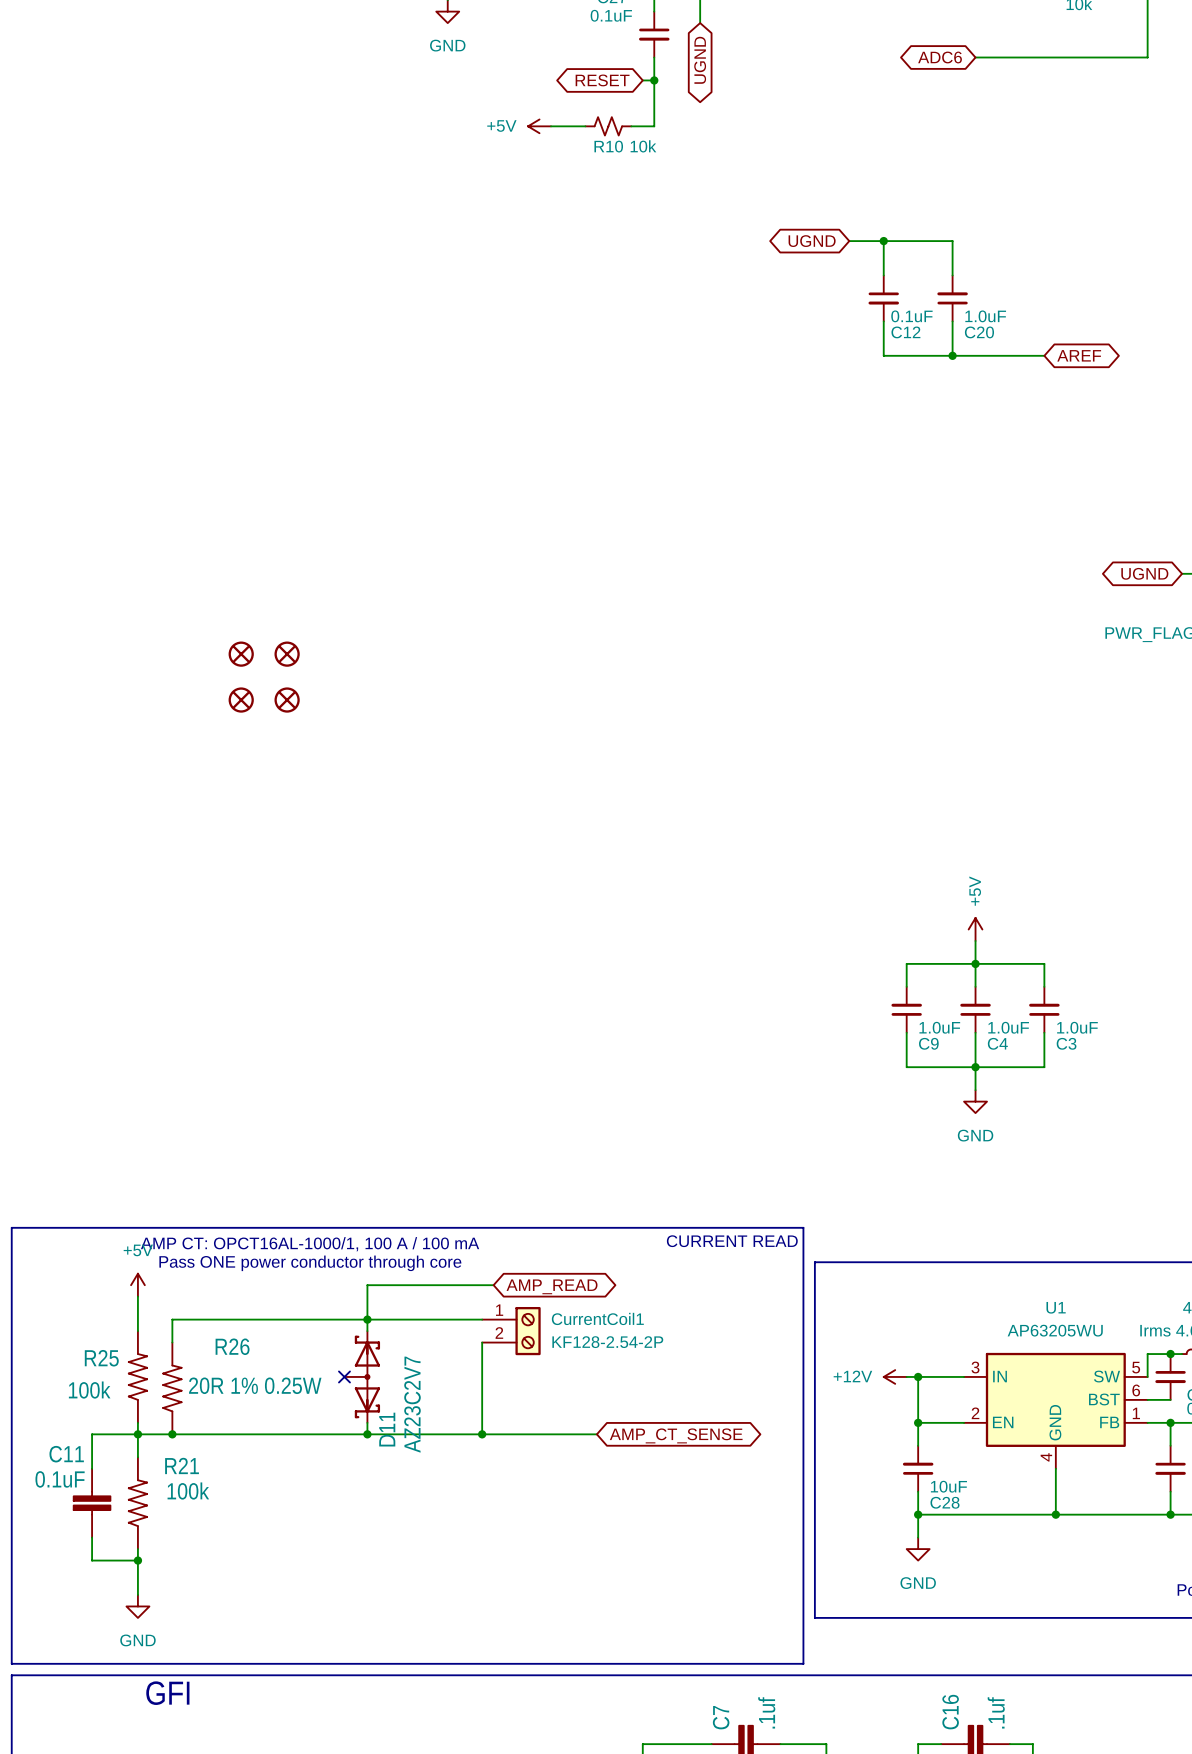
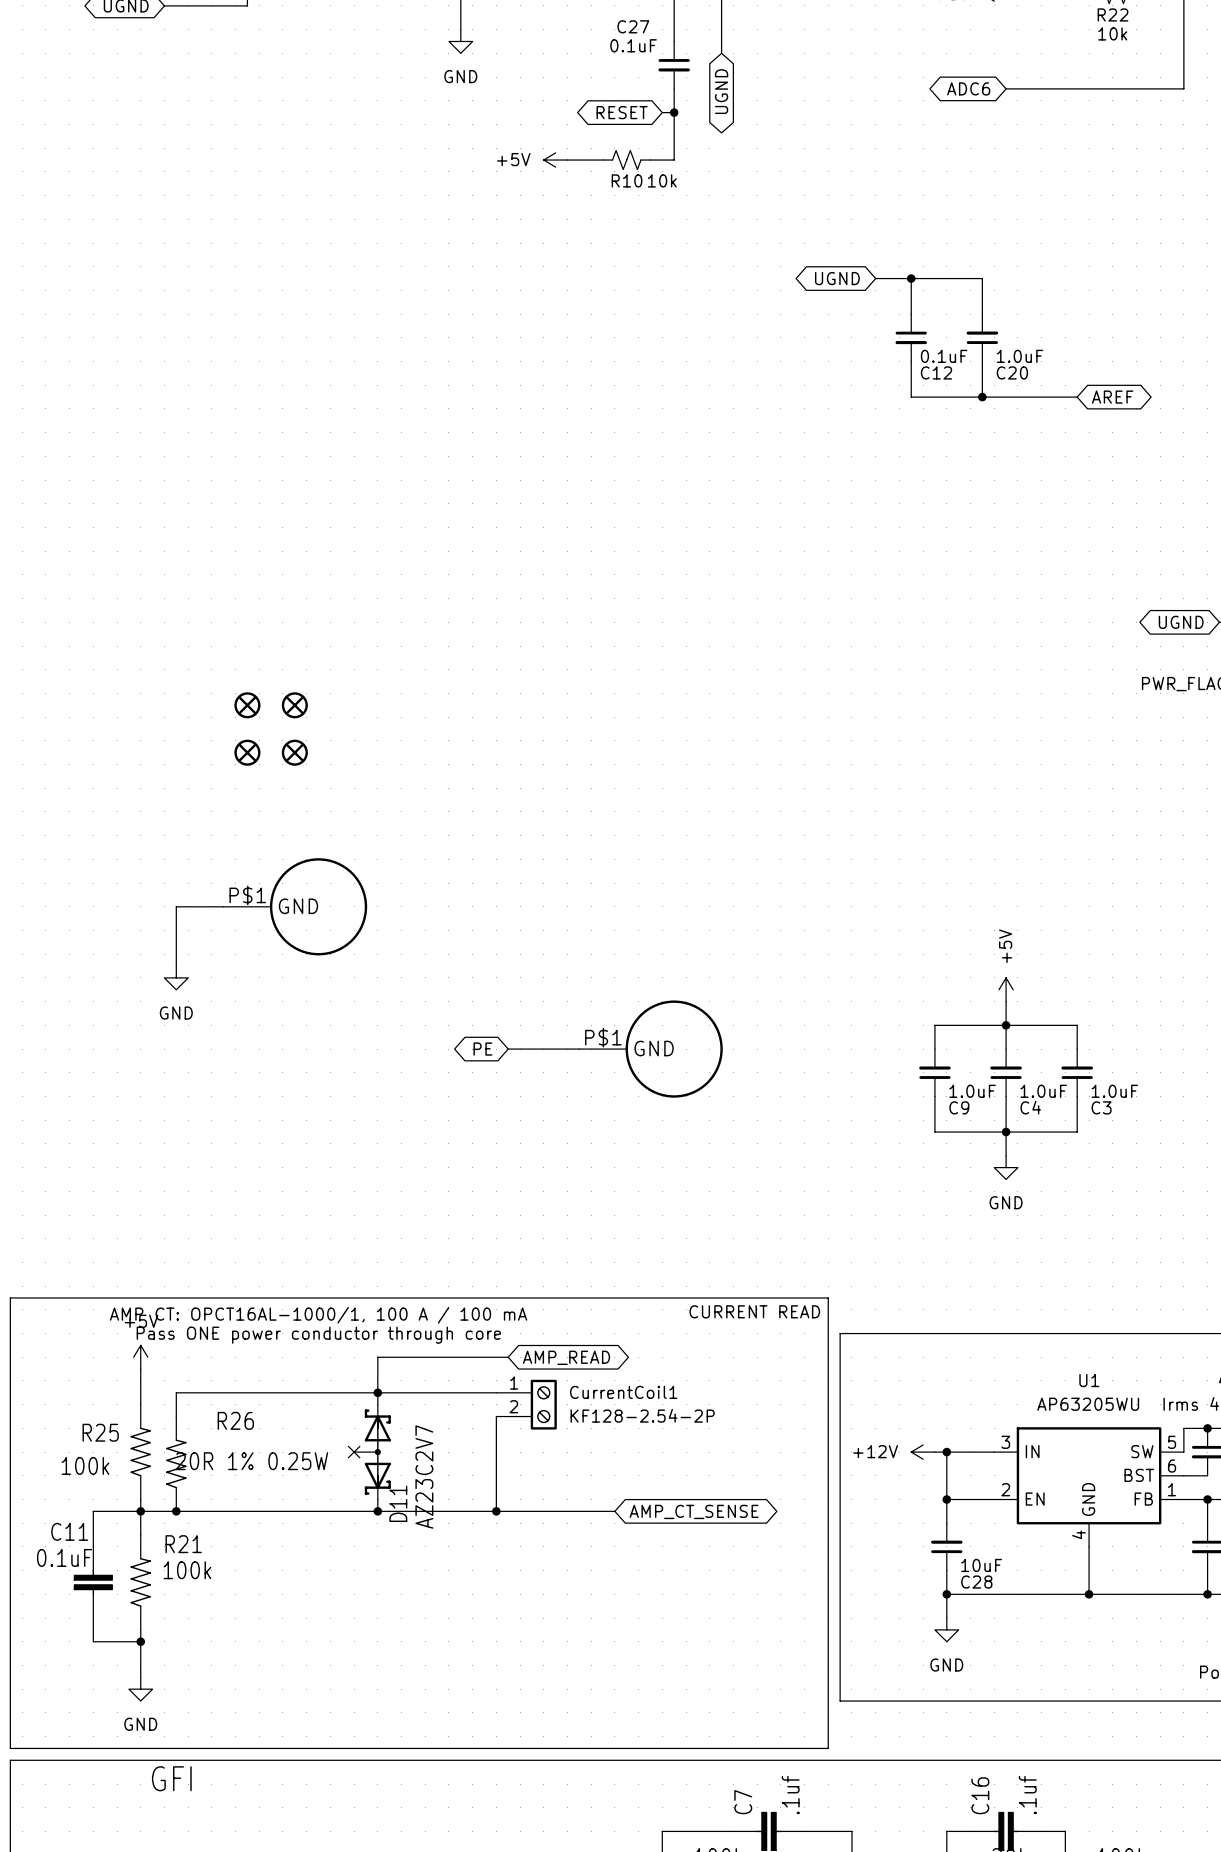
wire: none -> (223, 906) (176, 906) (176, 966)
part: none -> (295, 906)
power symbol: none -> GND (176, 977)
global label: none -> PE (482, 1049)
wire: none -> (508, 1049) (579, 1049)
part: none -> (651, 1049)

